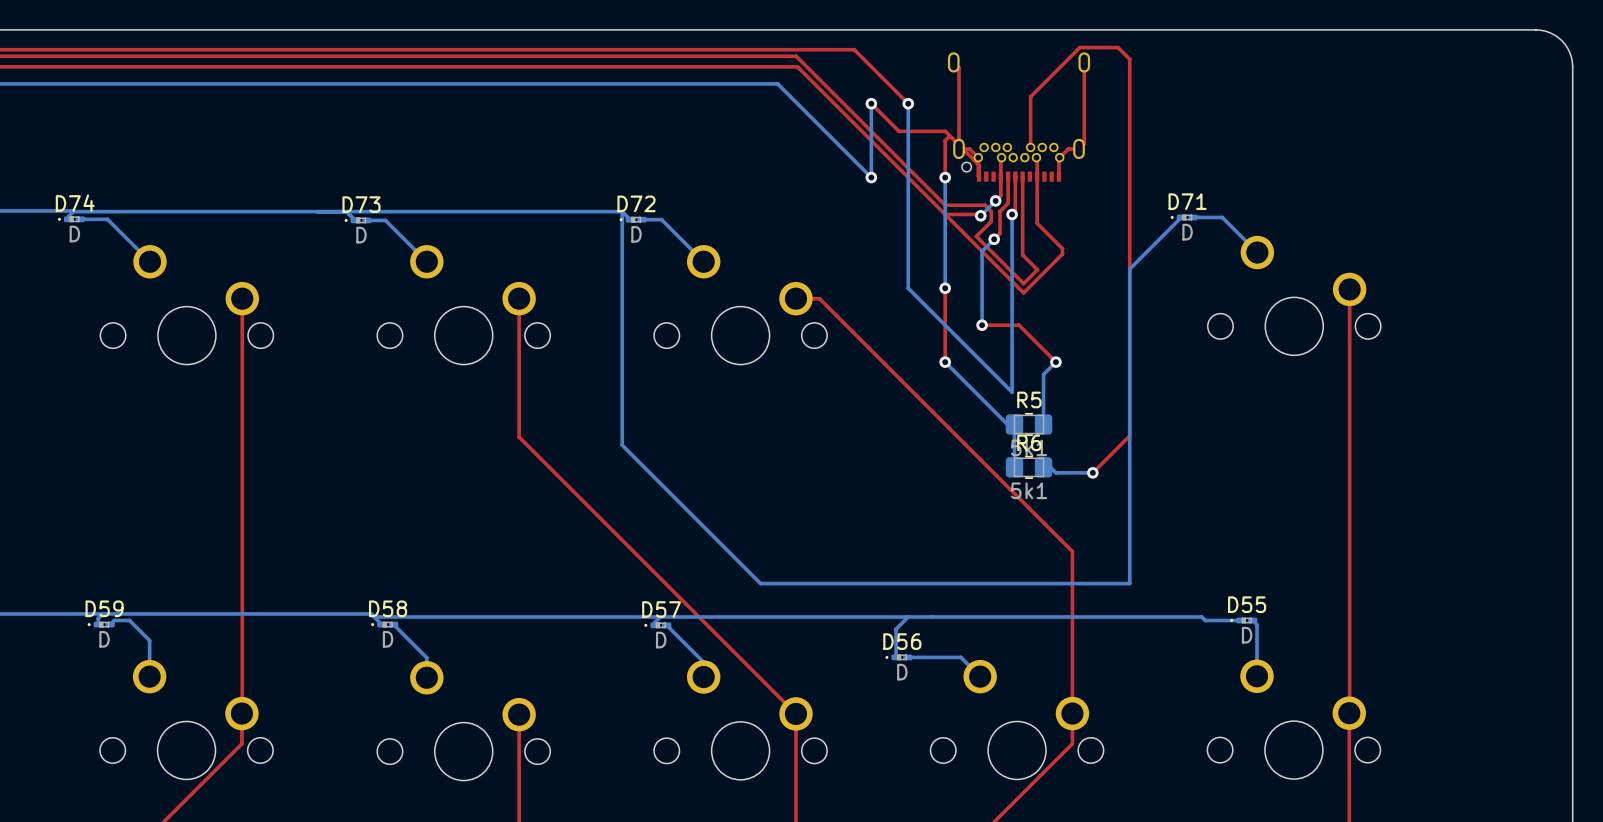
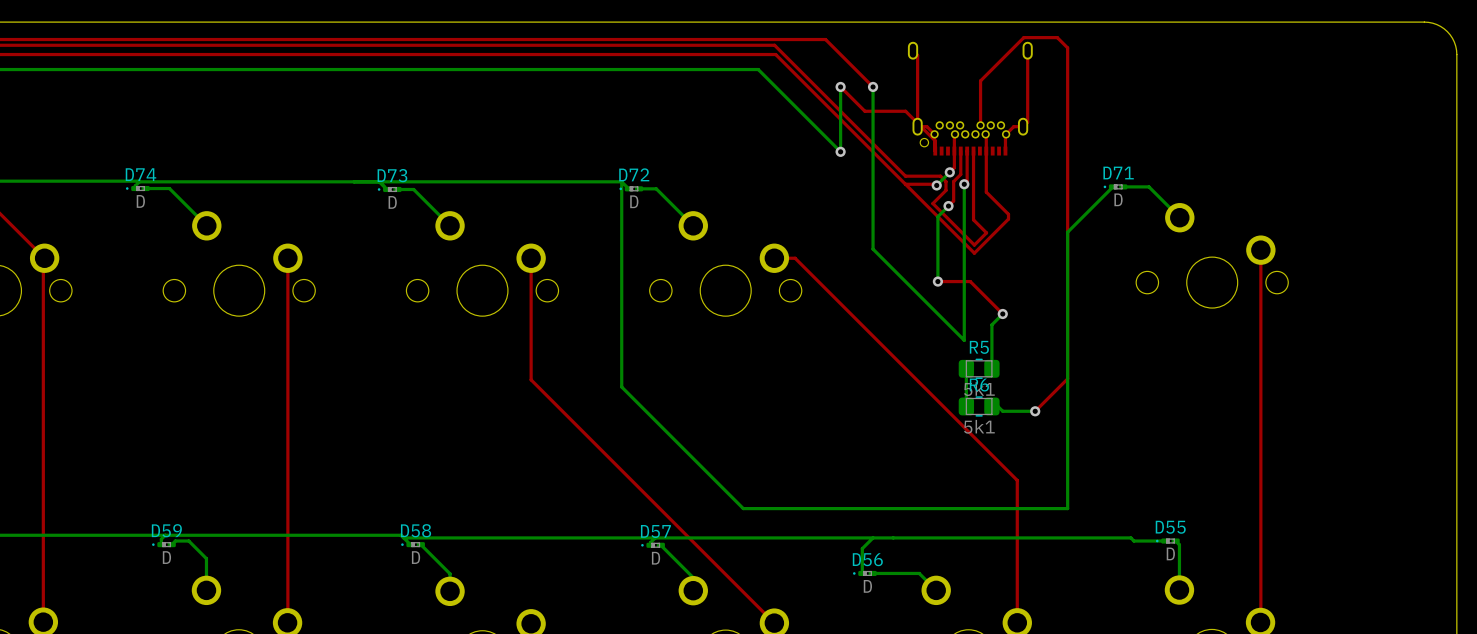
top track: (949, 135) (945, 140) (945, 177) -> none
bottom track: (945, 177) (945, 288) -> none
via: (945, 177) -> none
top track: (945, 288) (945, 362) -> none
via: (945, 288) -> none
bottom track: (945, 362) (1007, 424) (1014, 424) -> none
via: (945, 362) -> none

